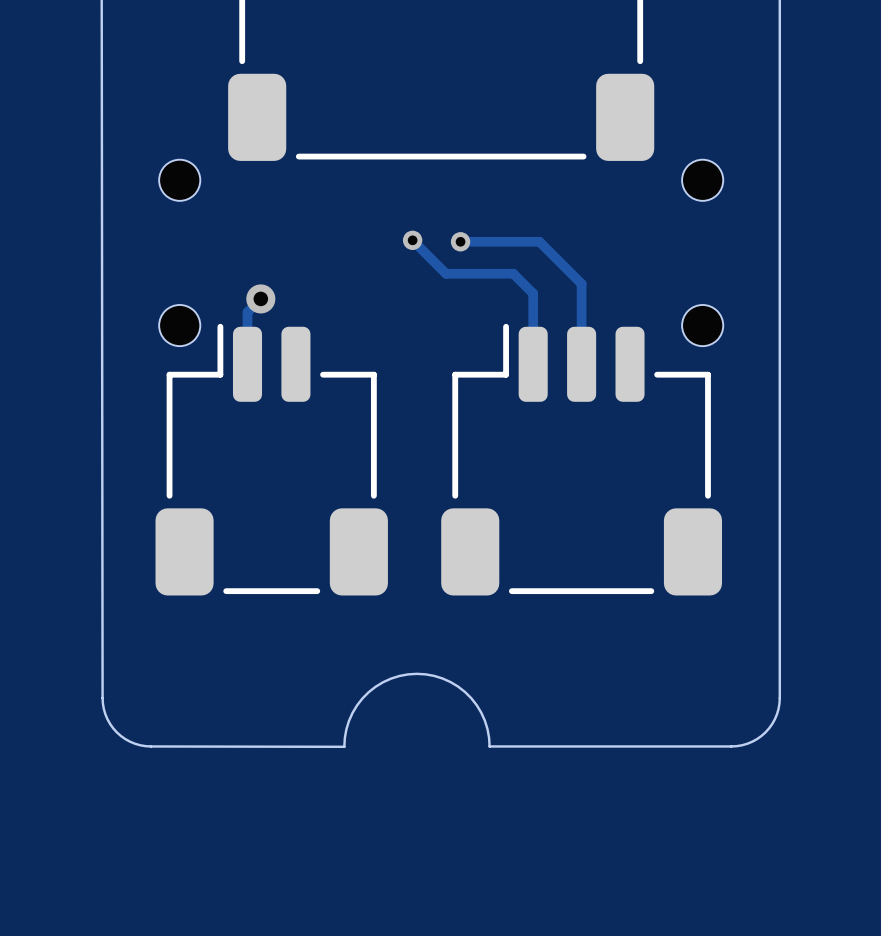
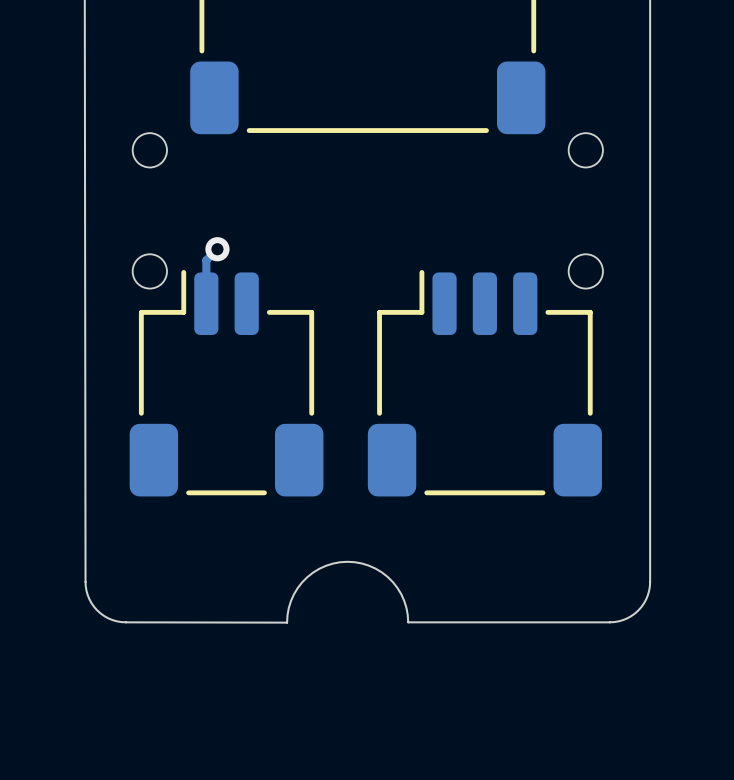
track: (412, 240) (446, 273) (513, 273) (533, 293) (533, 364) -> none
via: (412, 240) -> none
track: (460, 241) (539, 241) (581, 283) (581, 364) -> none
via: (460, 241) -> none

